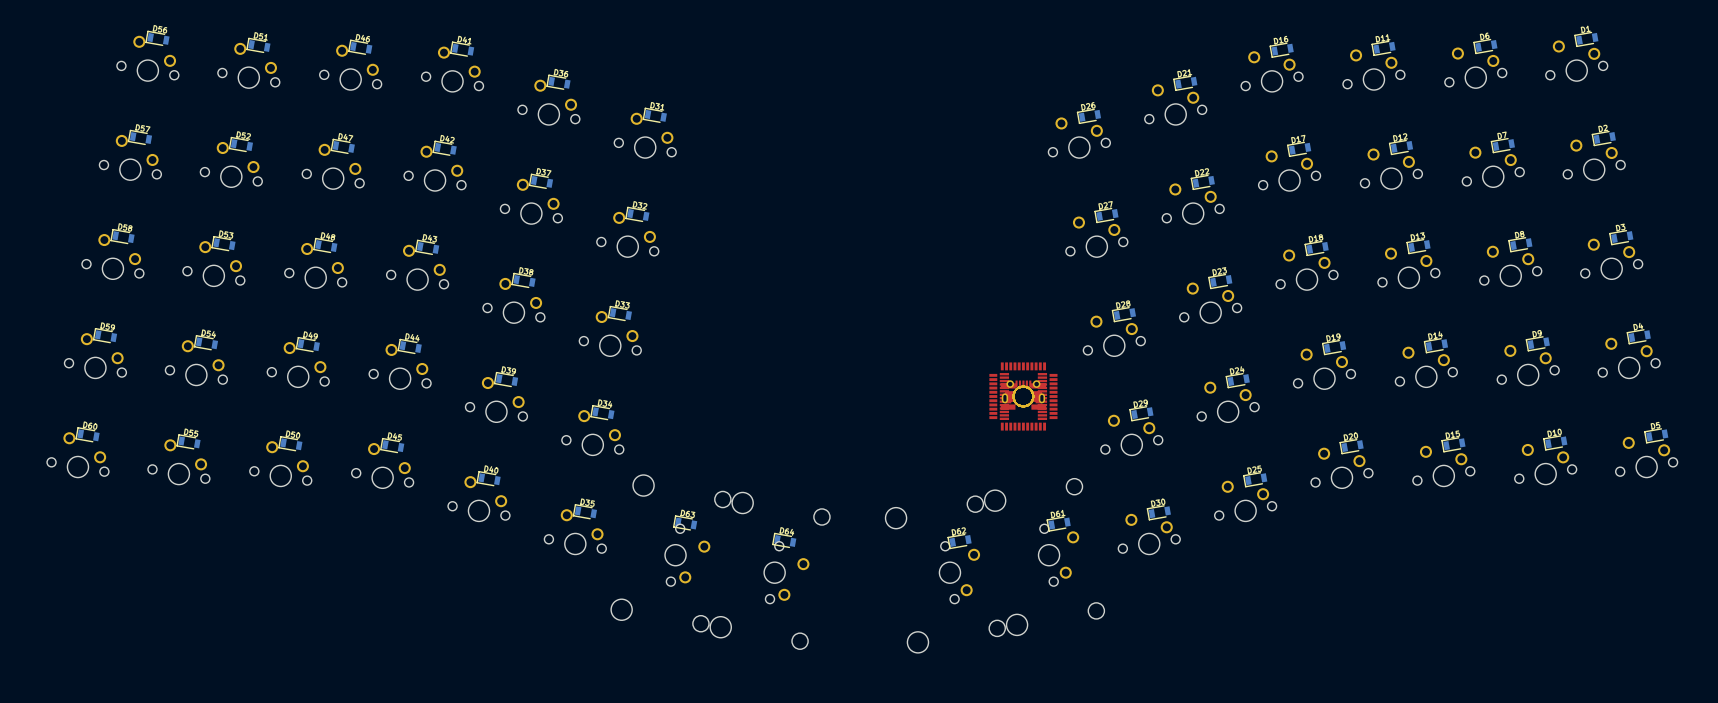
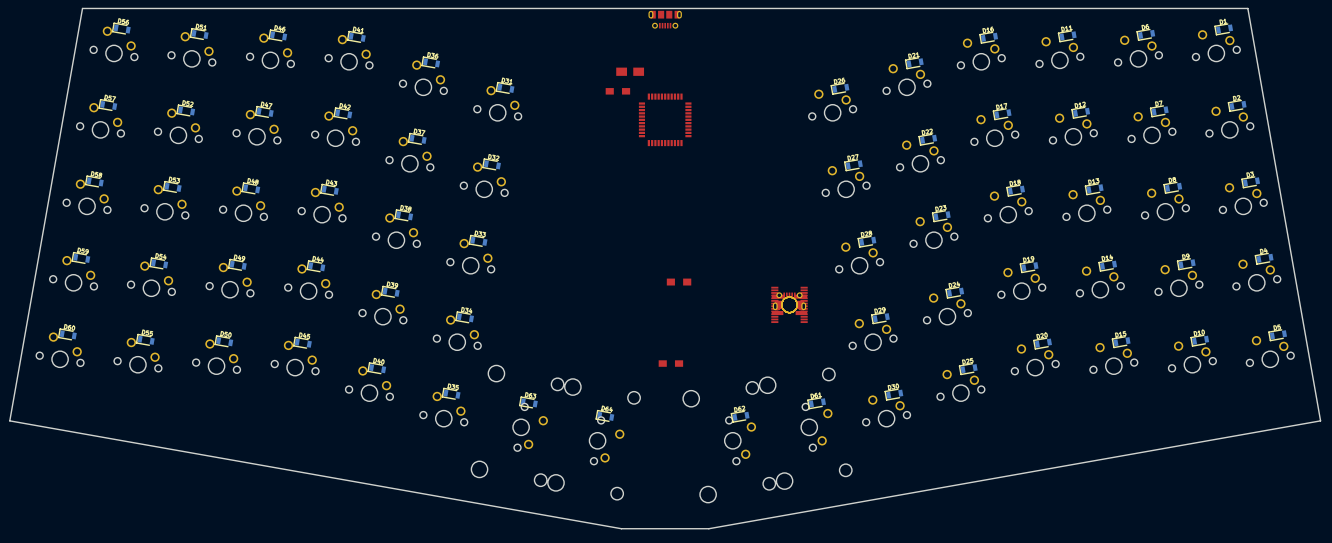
board edge: none -> (1247, 8) (82, 8) (9, 420) (621, 528) (708, 528) (1320, 420) (1247, 8)
part: none -> (665, 19)
part: none -> (630, 71)
part: none -> (617, 91)
part: none -> (665, 119)
part: none -> (679, 282)
part: (1023, 396) -> none
part: none -> (670, 363)

